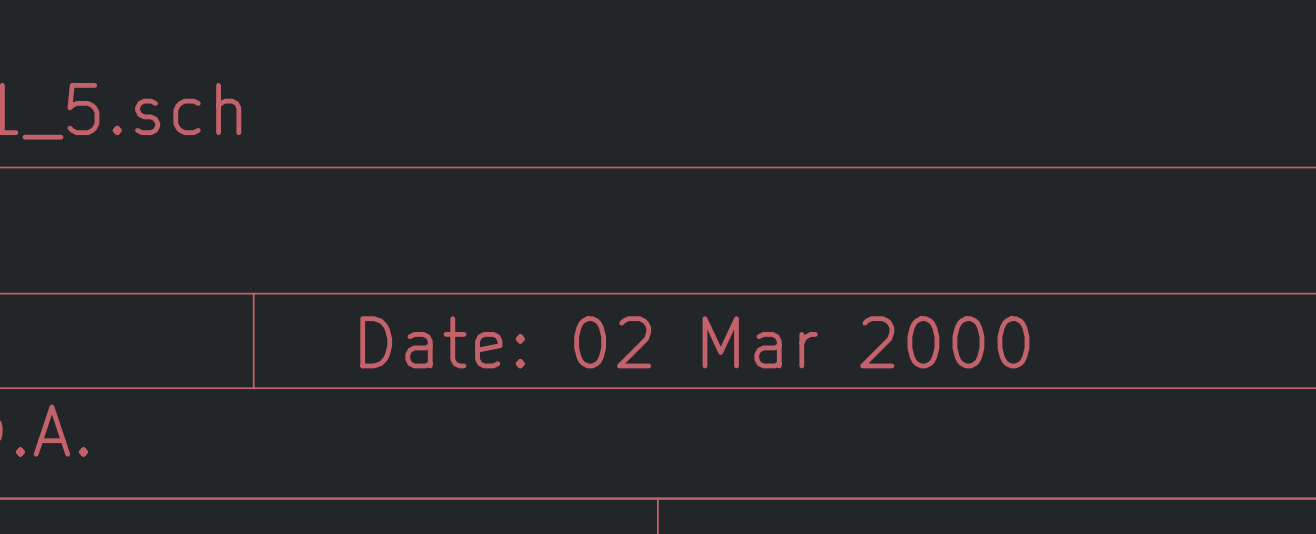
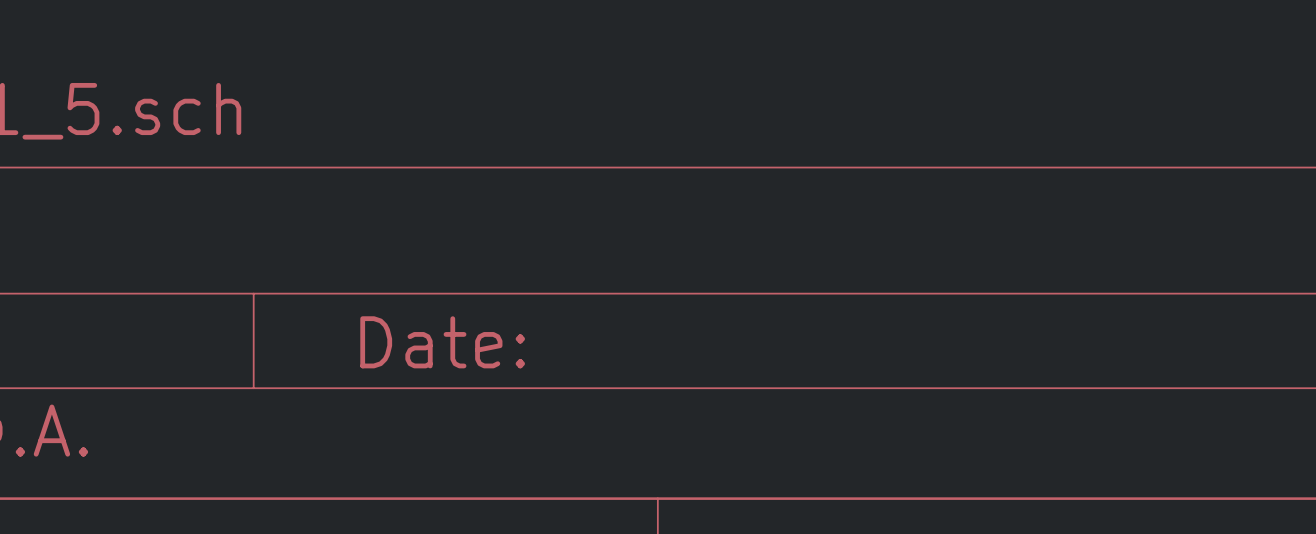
title block: Date: 02 Mar 2000 (694, 342) -> Date: (442, 342)

